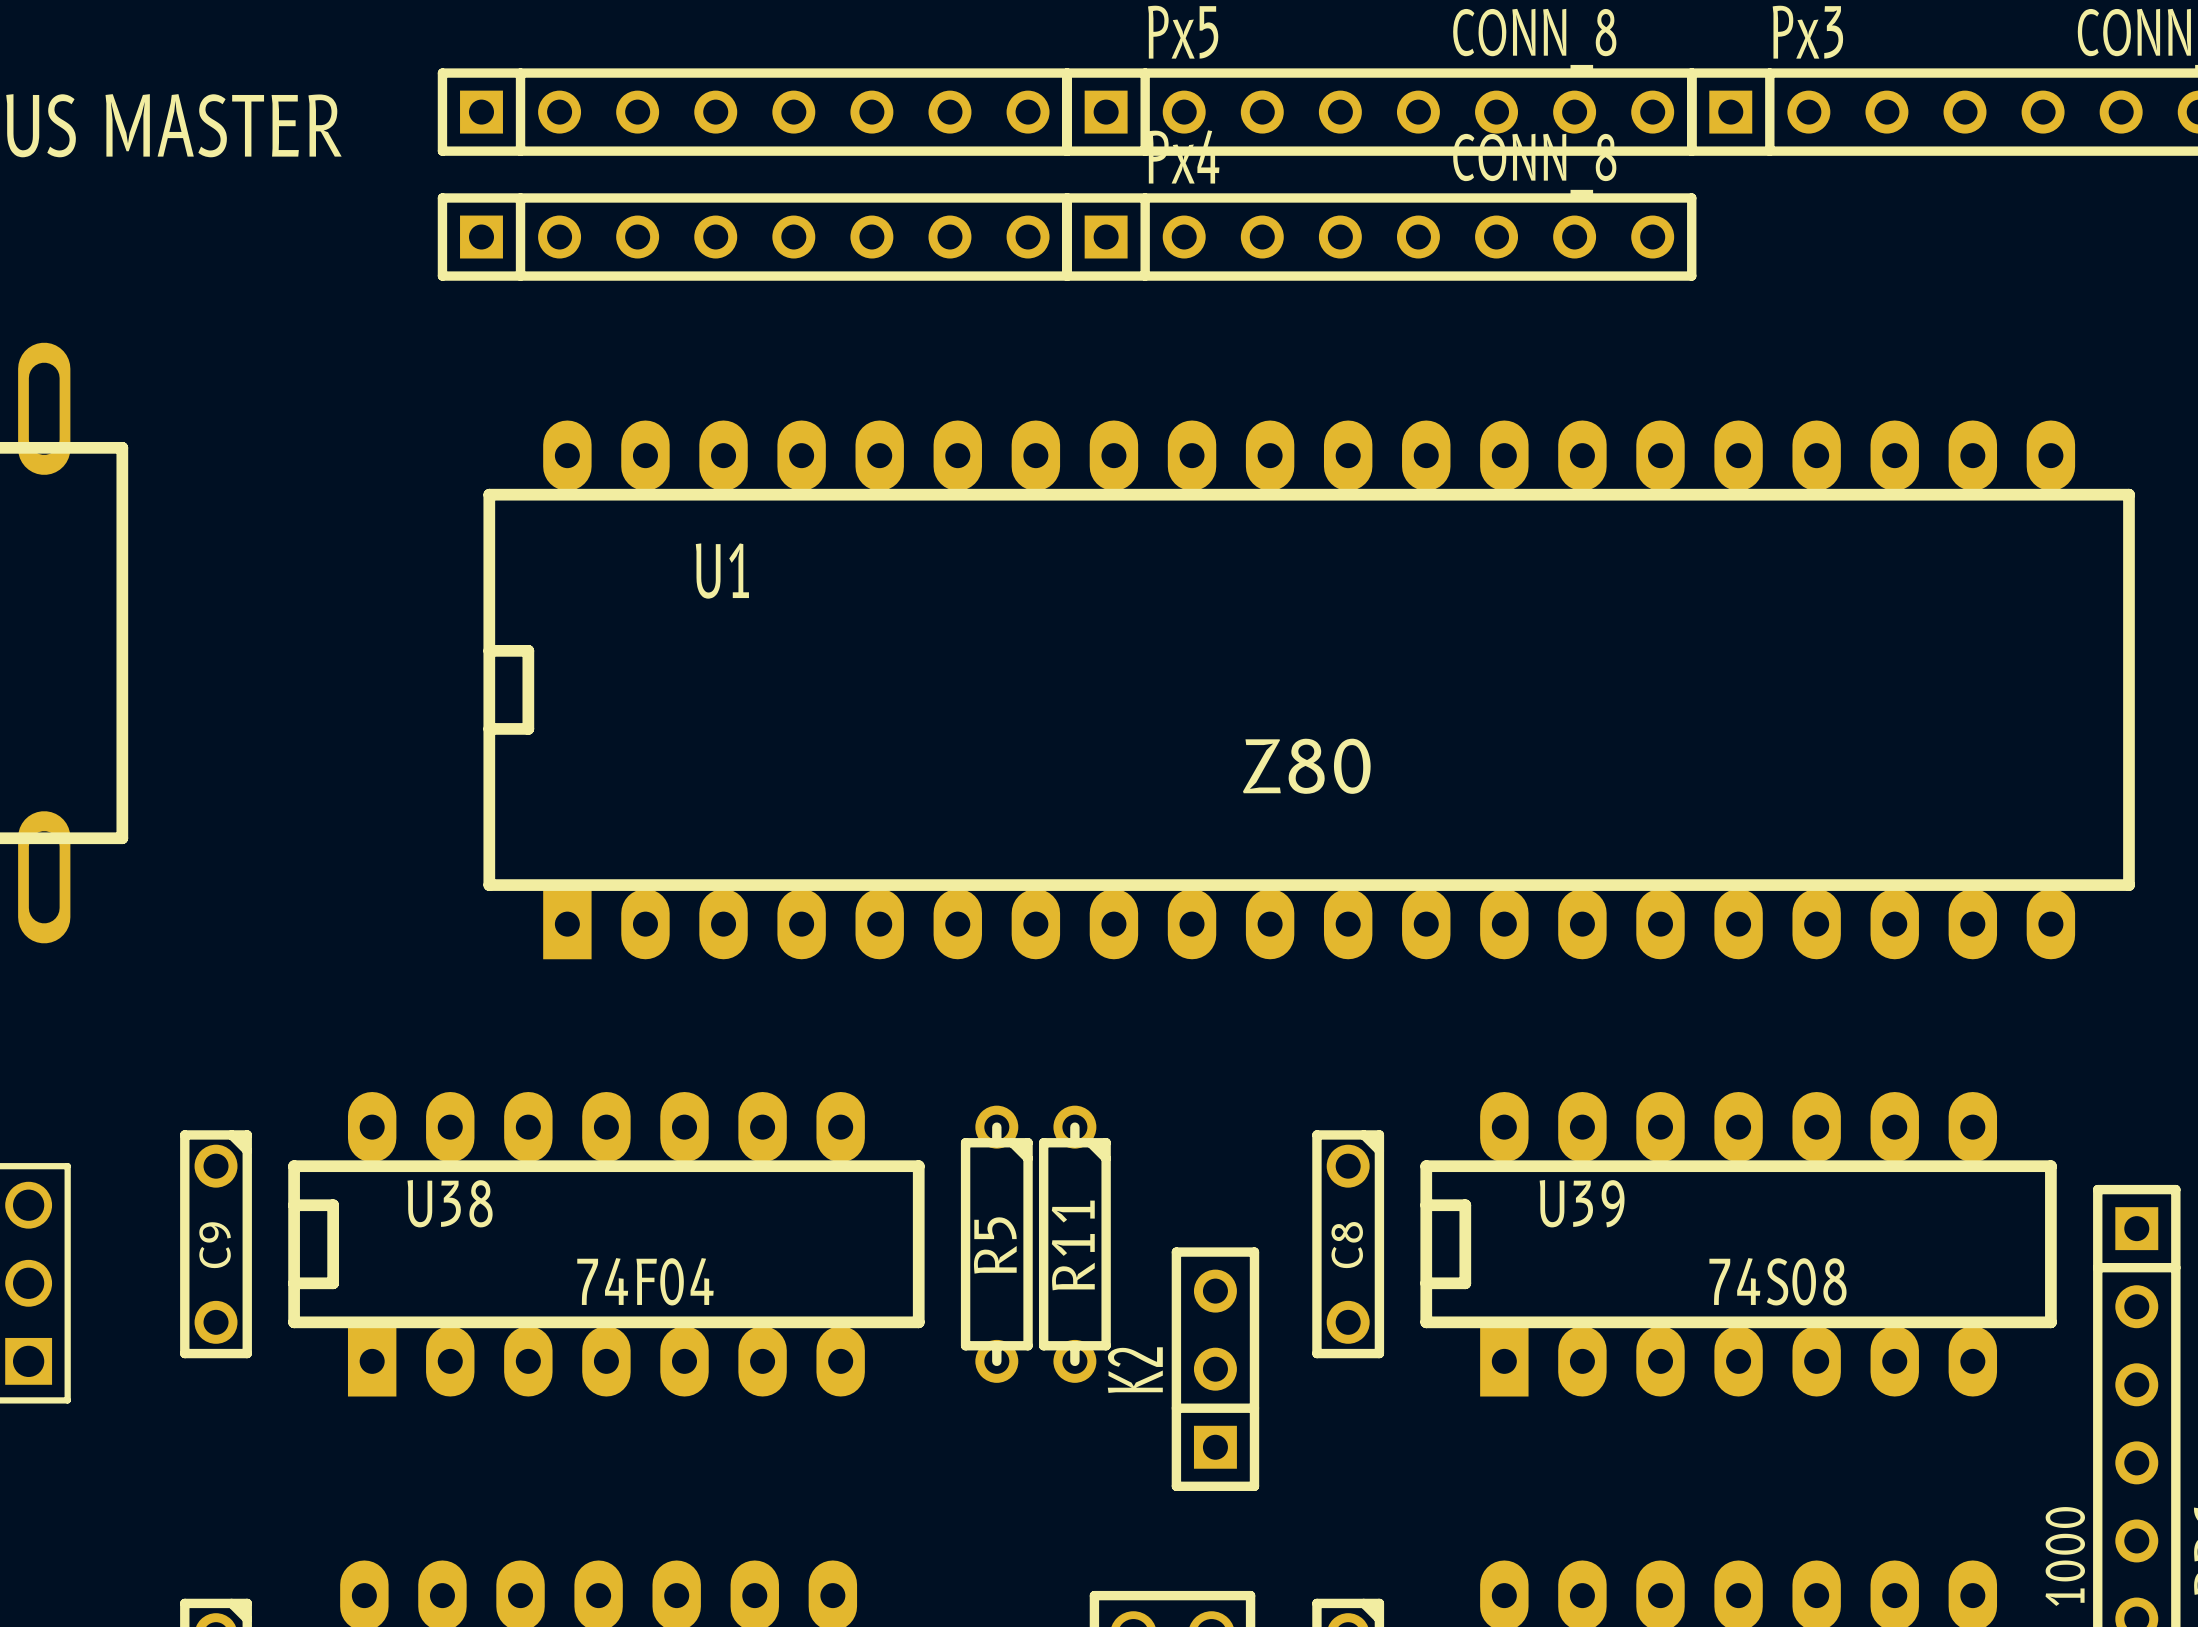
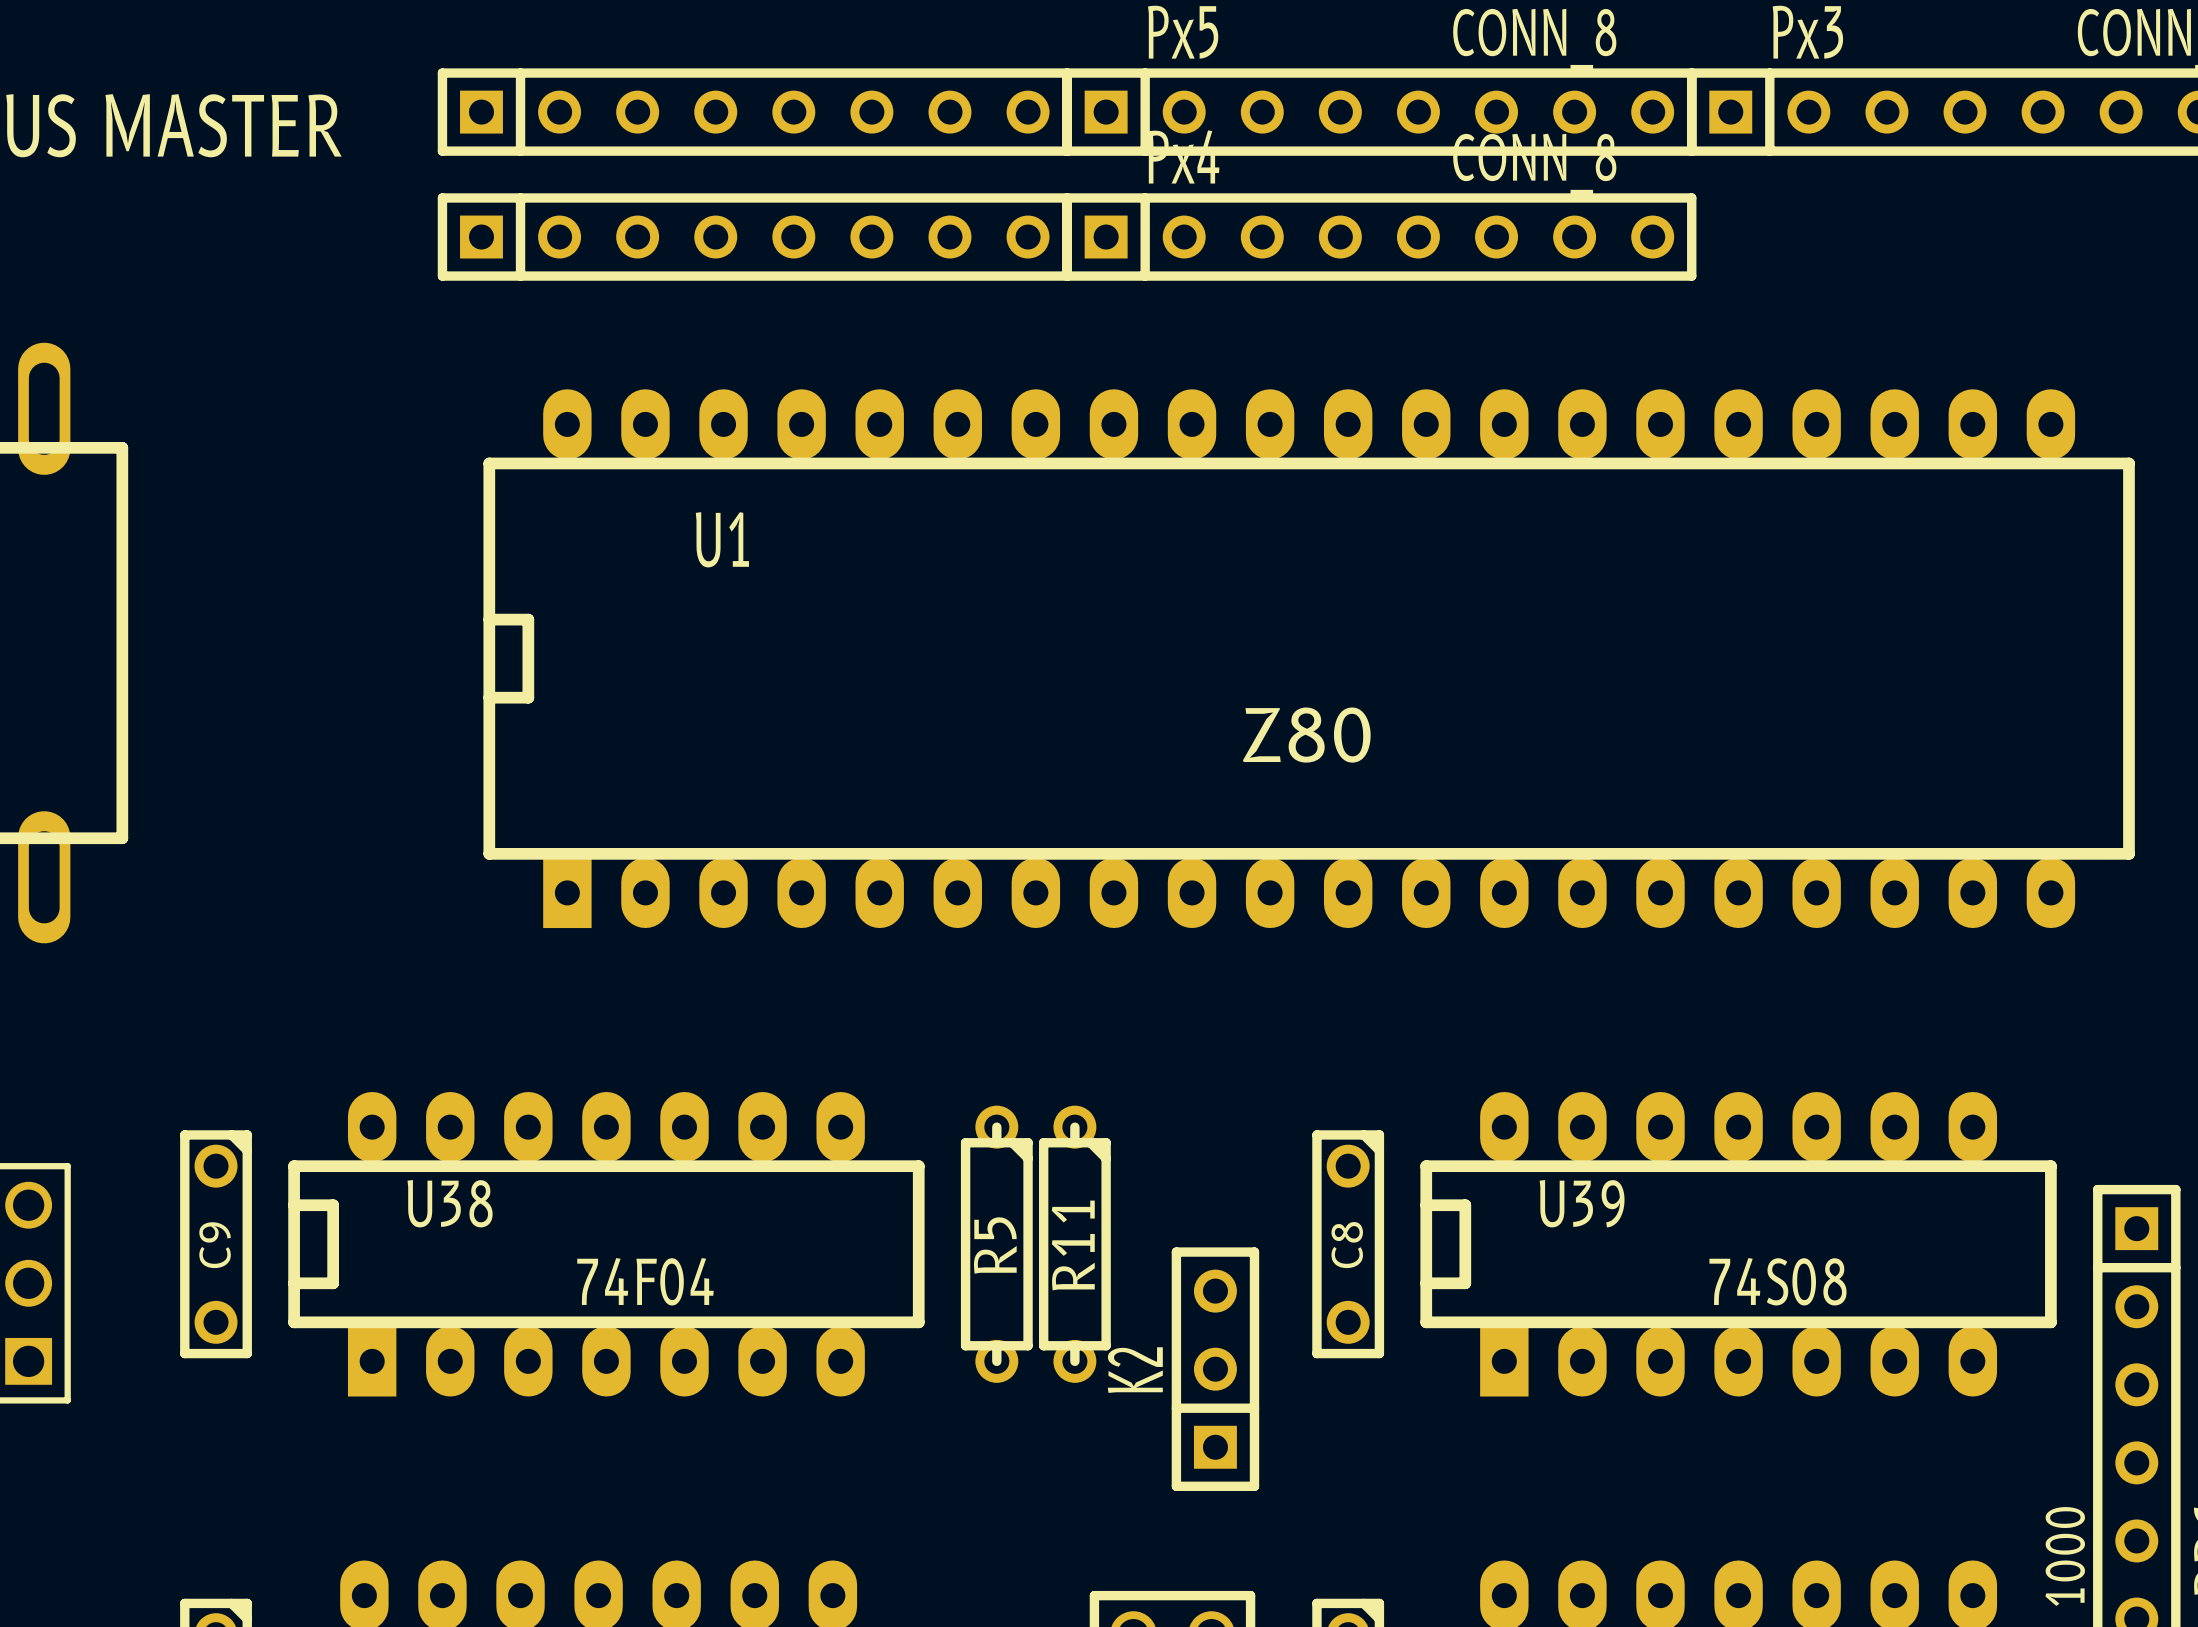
U1 position: (1309, 689) -> (1309, 658)

